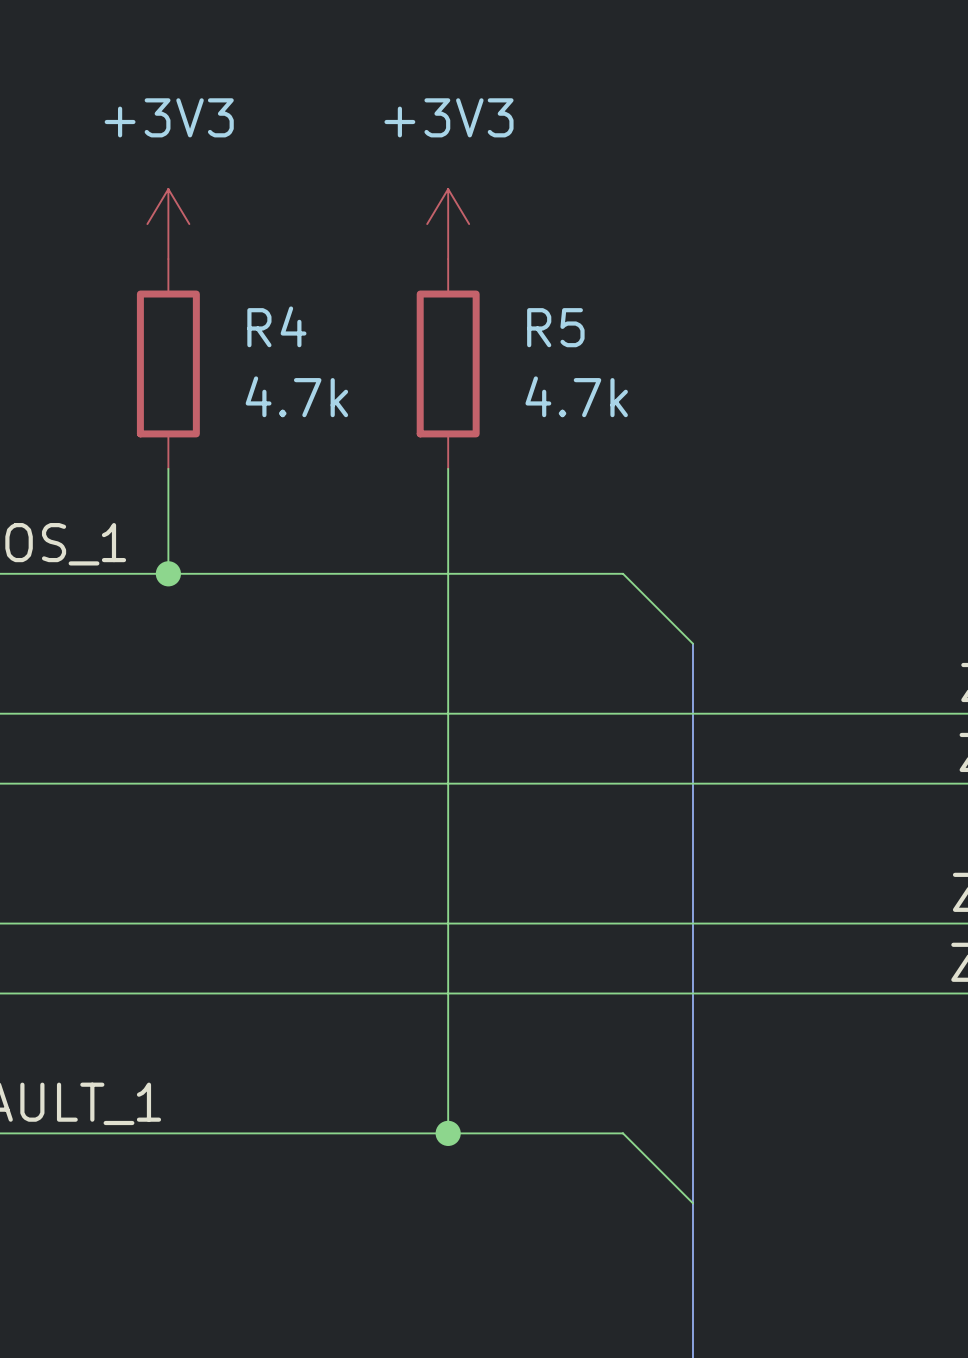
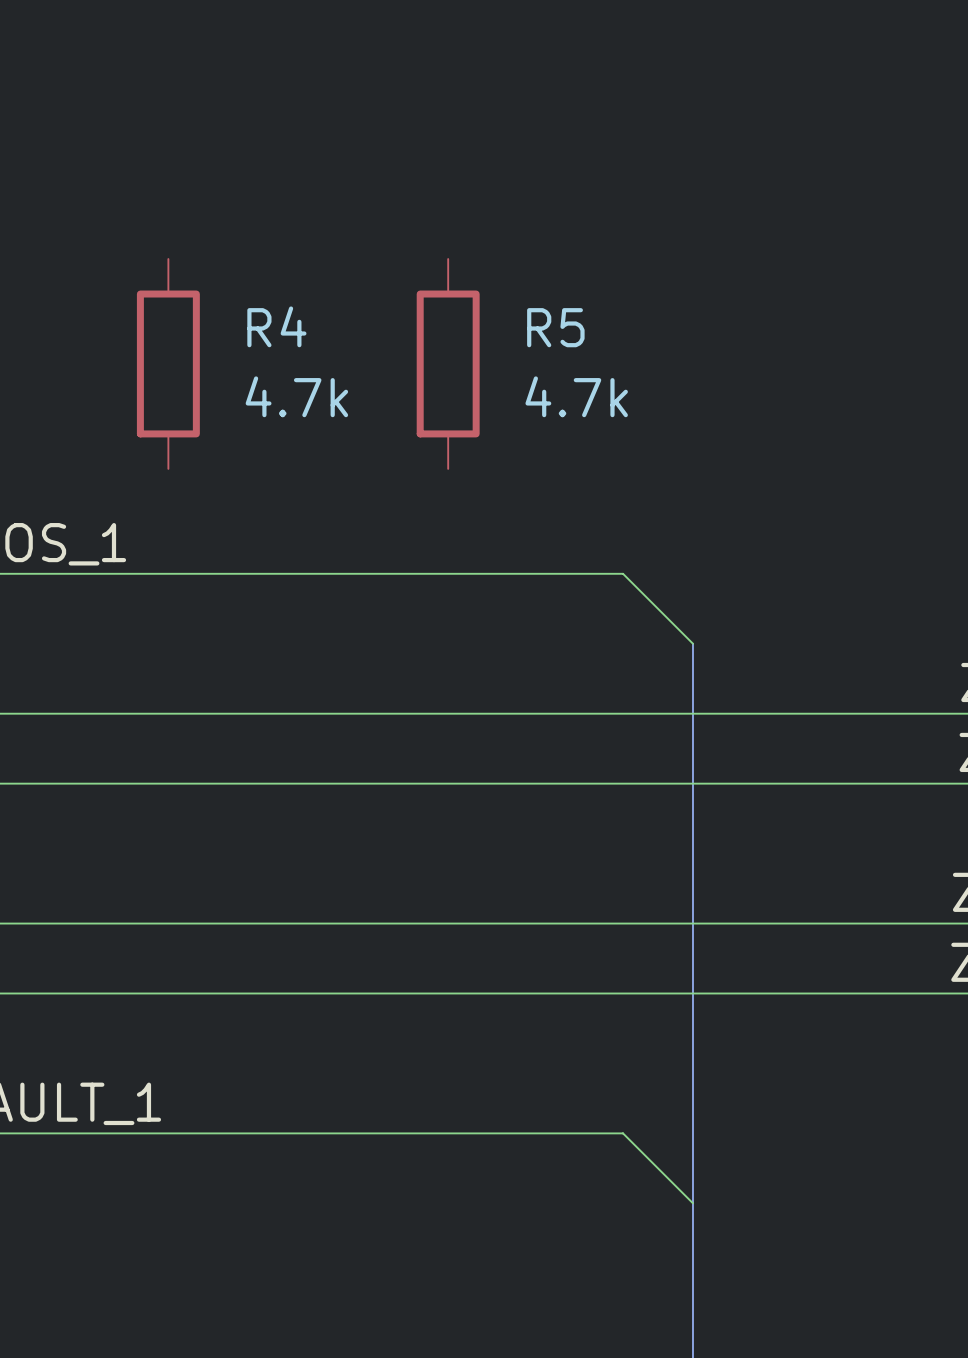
power symbol: +3V3 (168, 224) -> none
power symbol: +3V3 (448, 224) -> none
wire: (168, 468) (168, 573) -> none
wire: (448, 468) (448, 1133) -> none
junction: (168, 573) -> none
junction: (448, 1133) -> none

